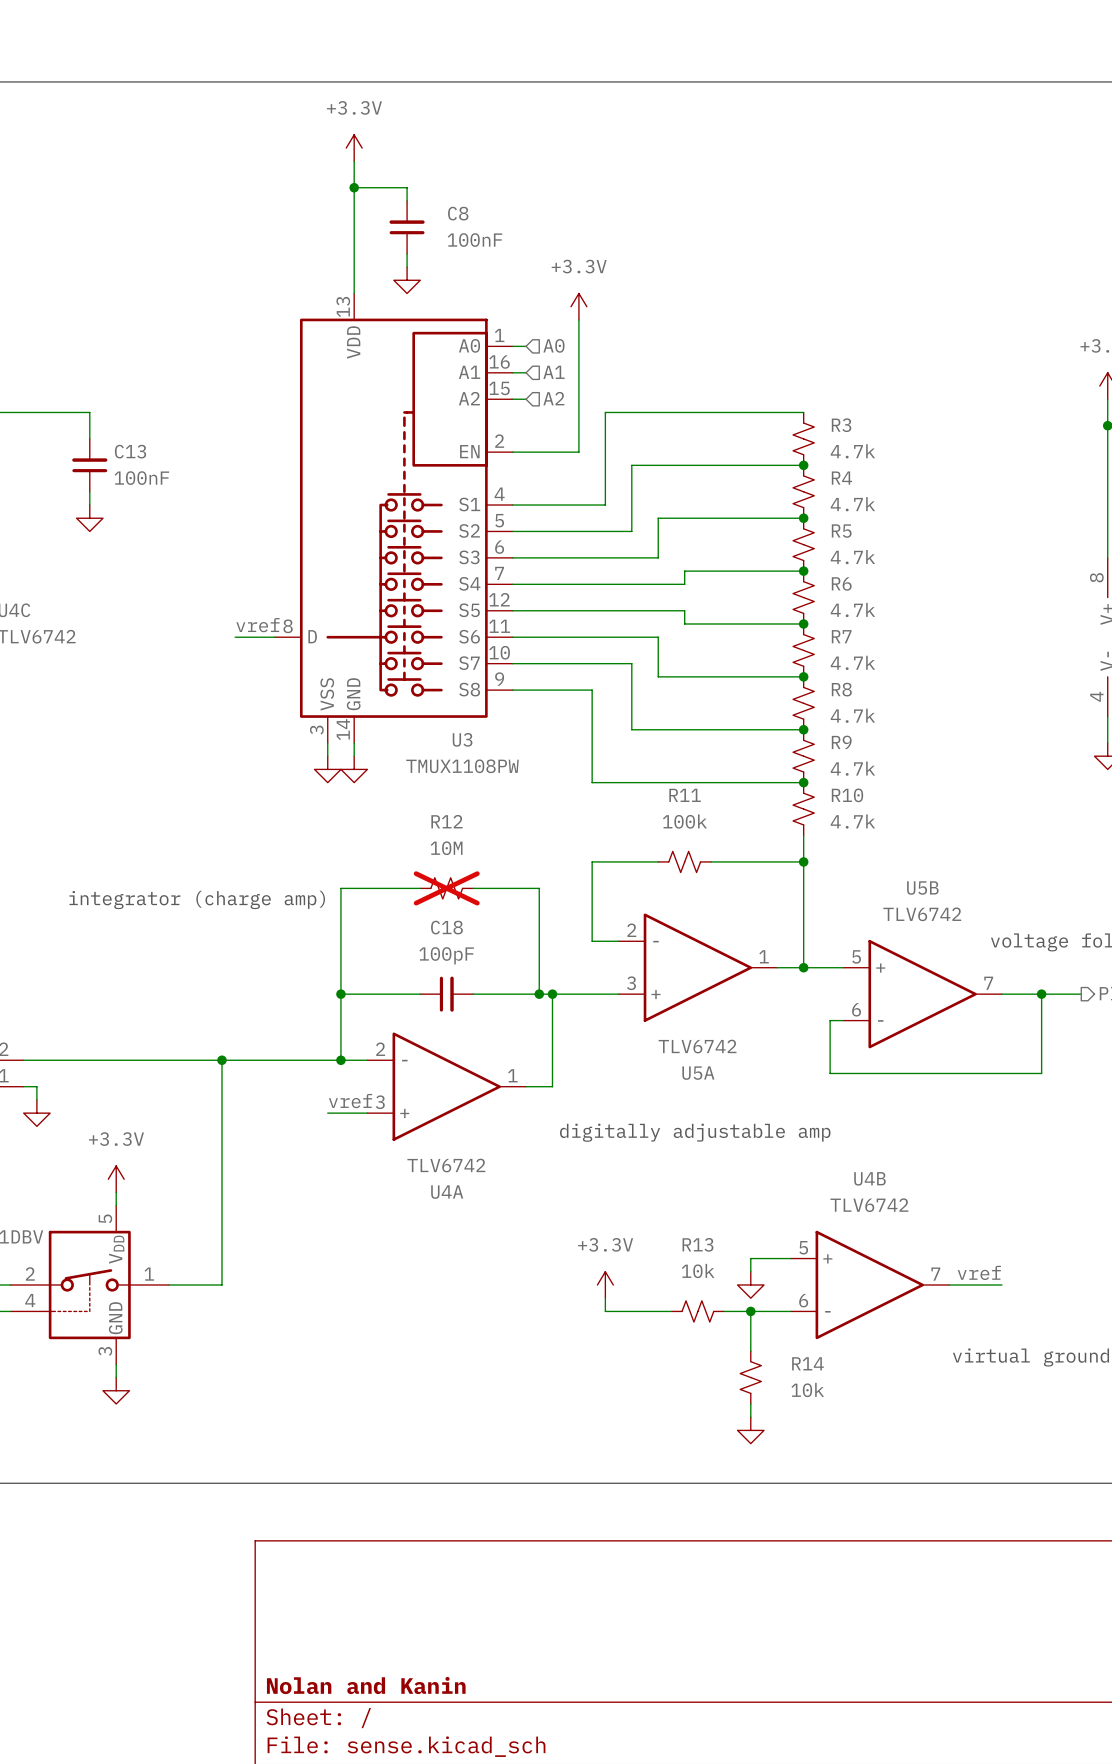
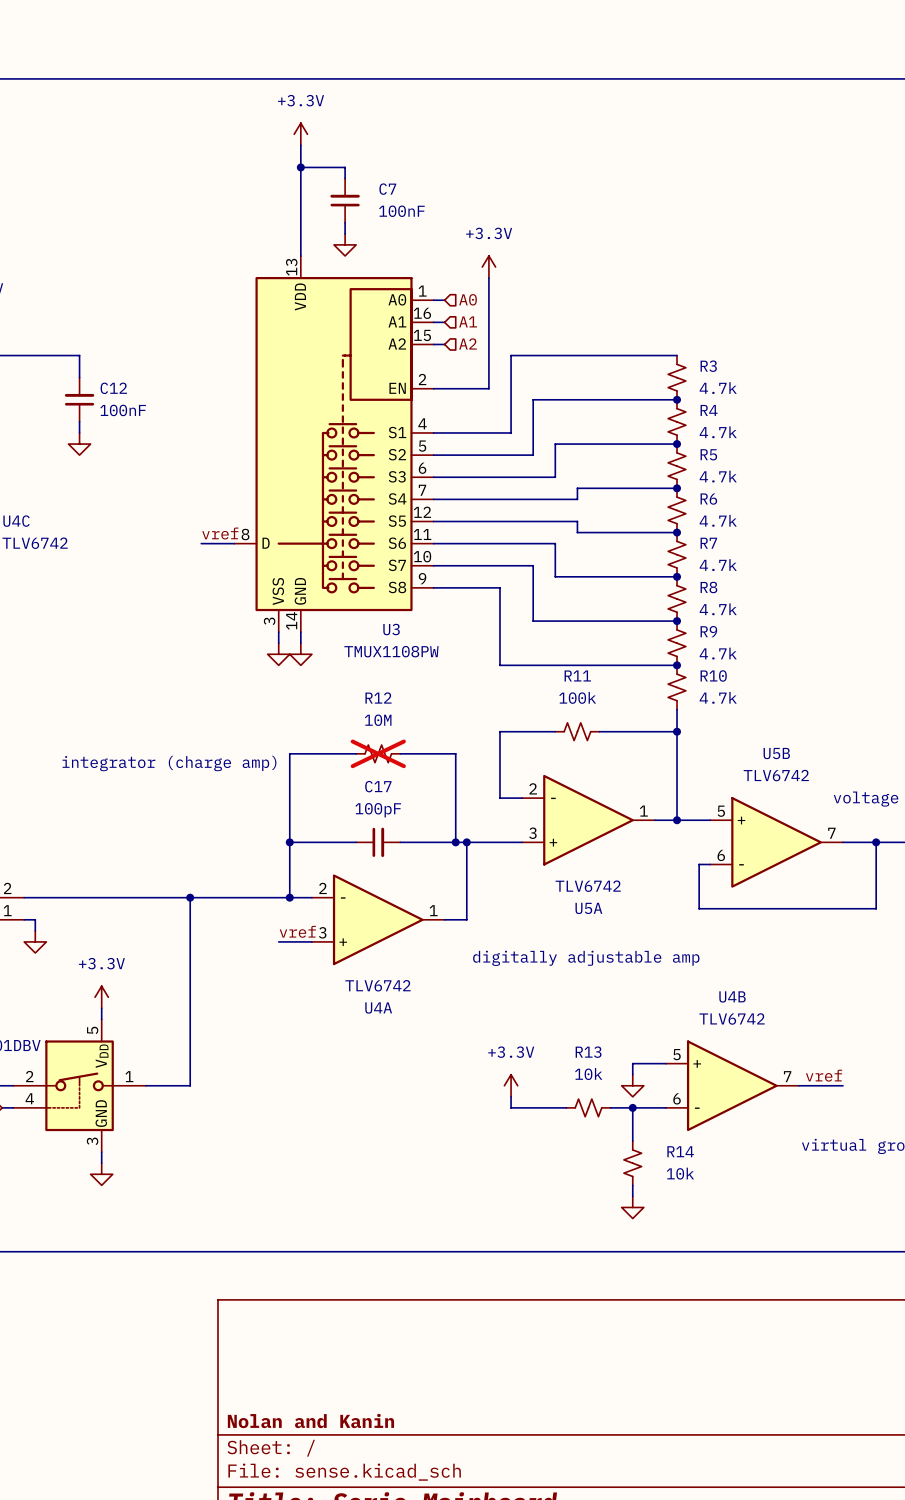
C8 name: C8 (458, 213) -> C7 (387, 189)
C13 name: C13 (130, 451) -> C12 (113, 388)
C18 name: C18 (446, 927) -> C17 (378, 786)

